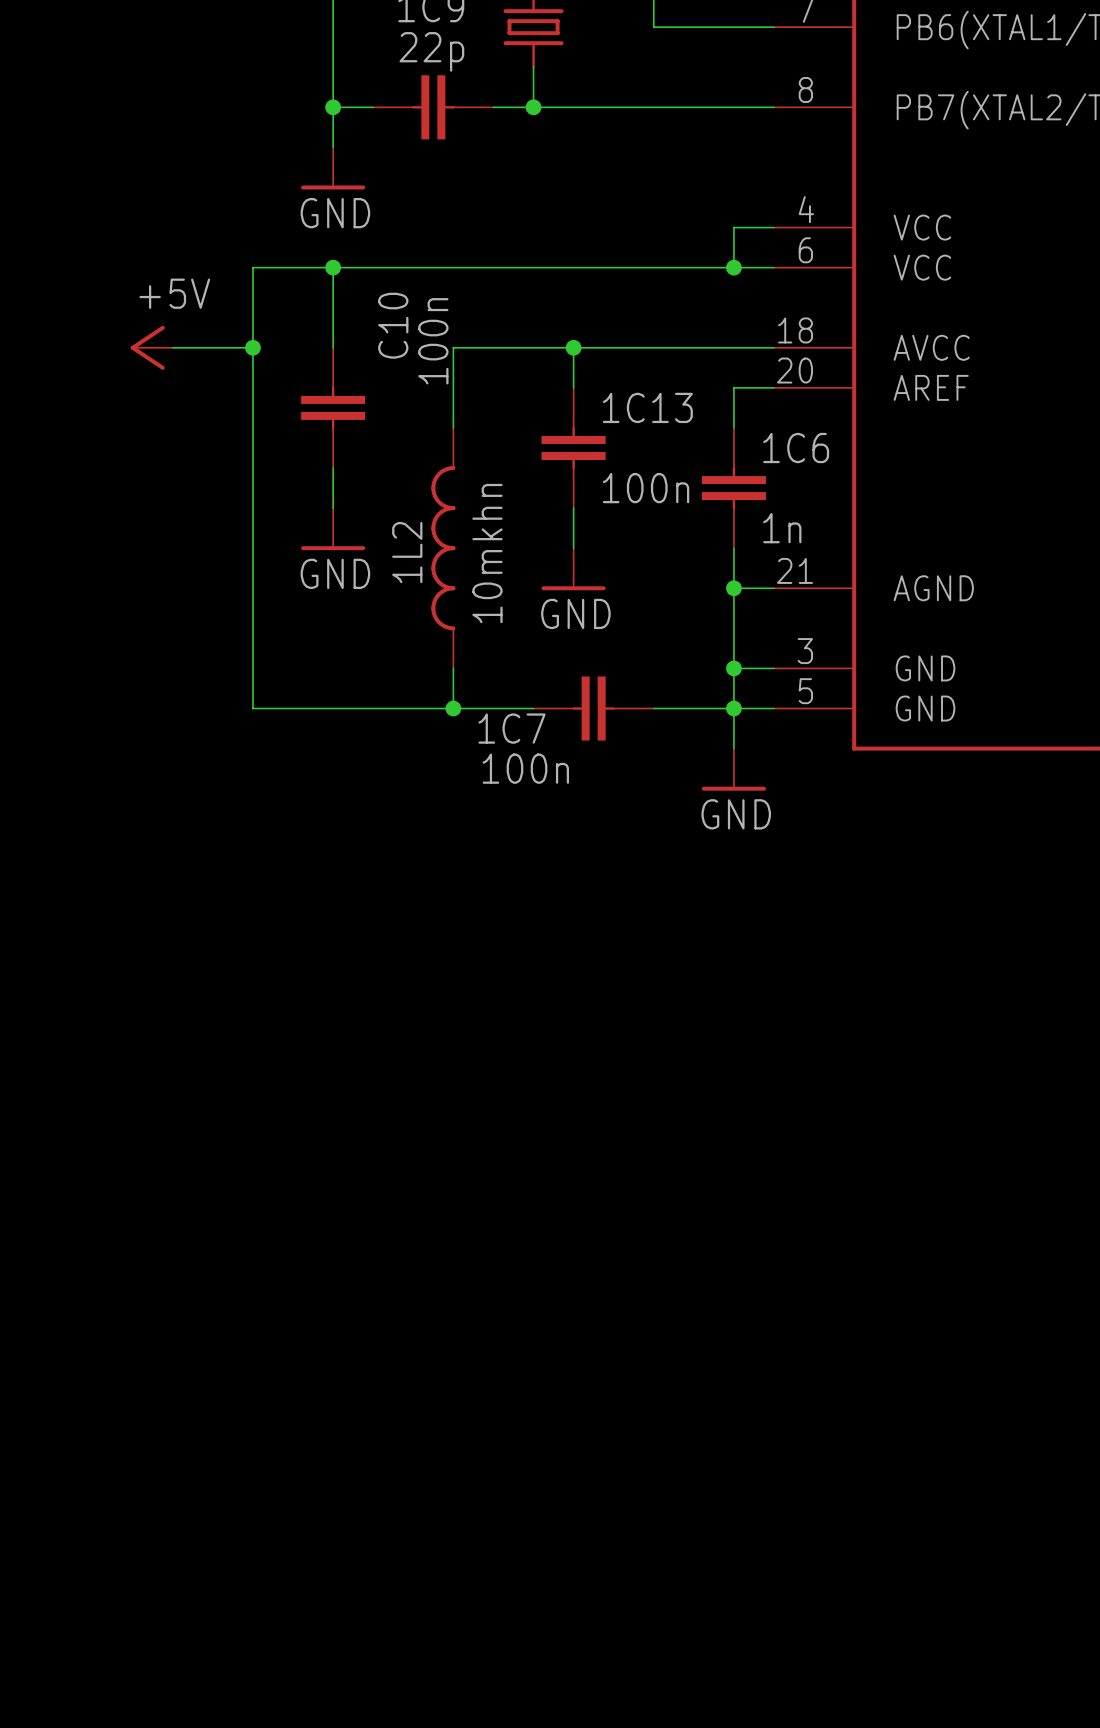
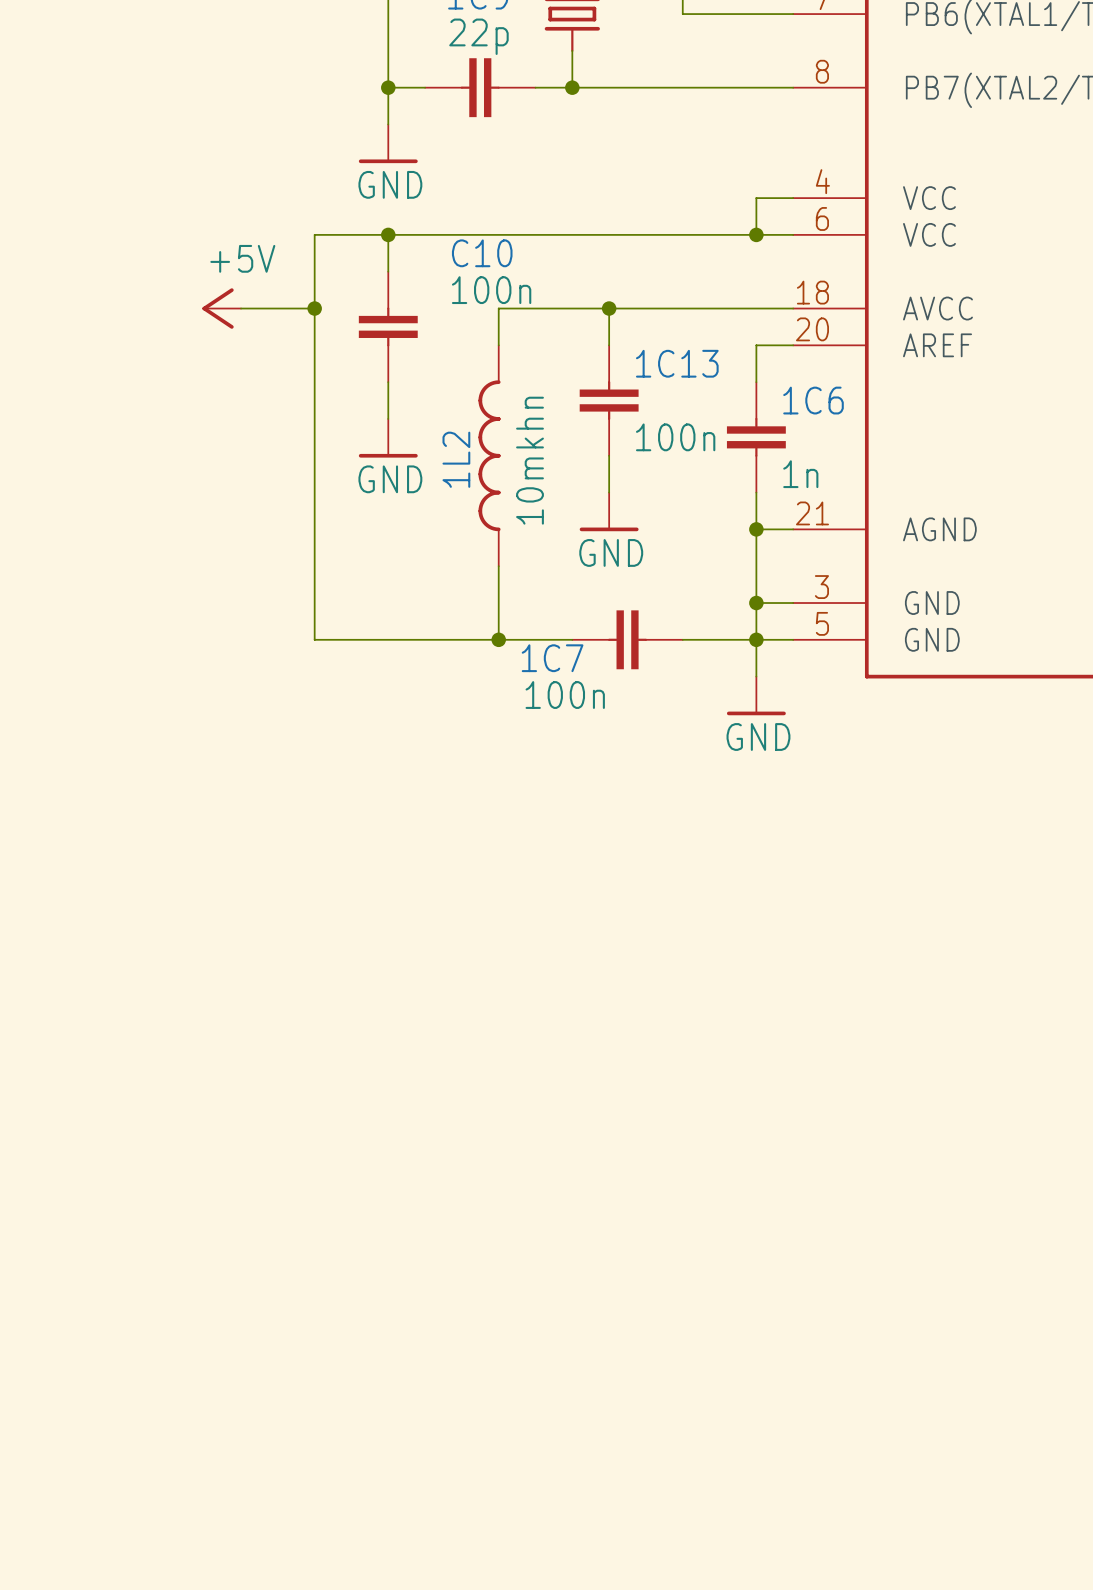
C10 name rotation: 0° (393, 325) -> 90° clockwise (482, 253)
C10 value rotation: 0° (433, 341) -> 90° clockwise (491, 290)
C10 position: (333, 407) -> (388, 326)
power symbol position: GND (333, 529) -> GND (388, 438)
1L2 position: (443, 548) -> (489, 455)

